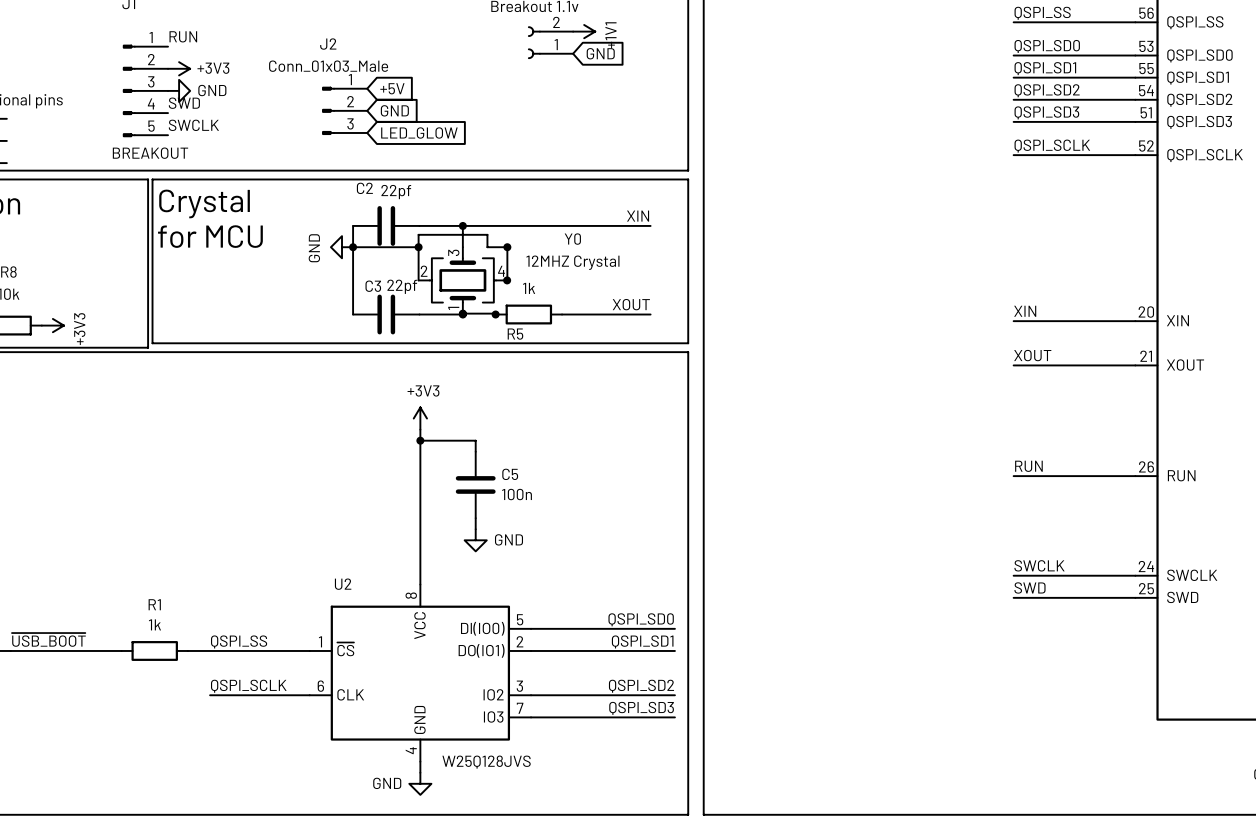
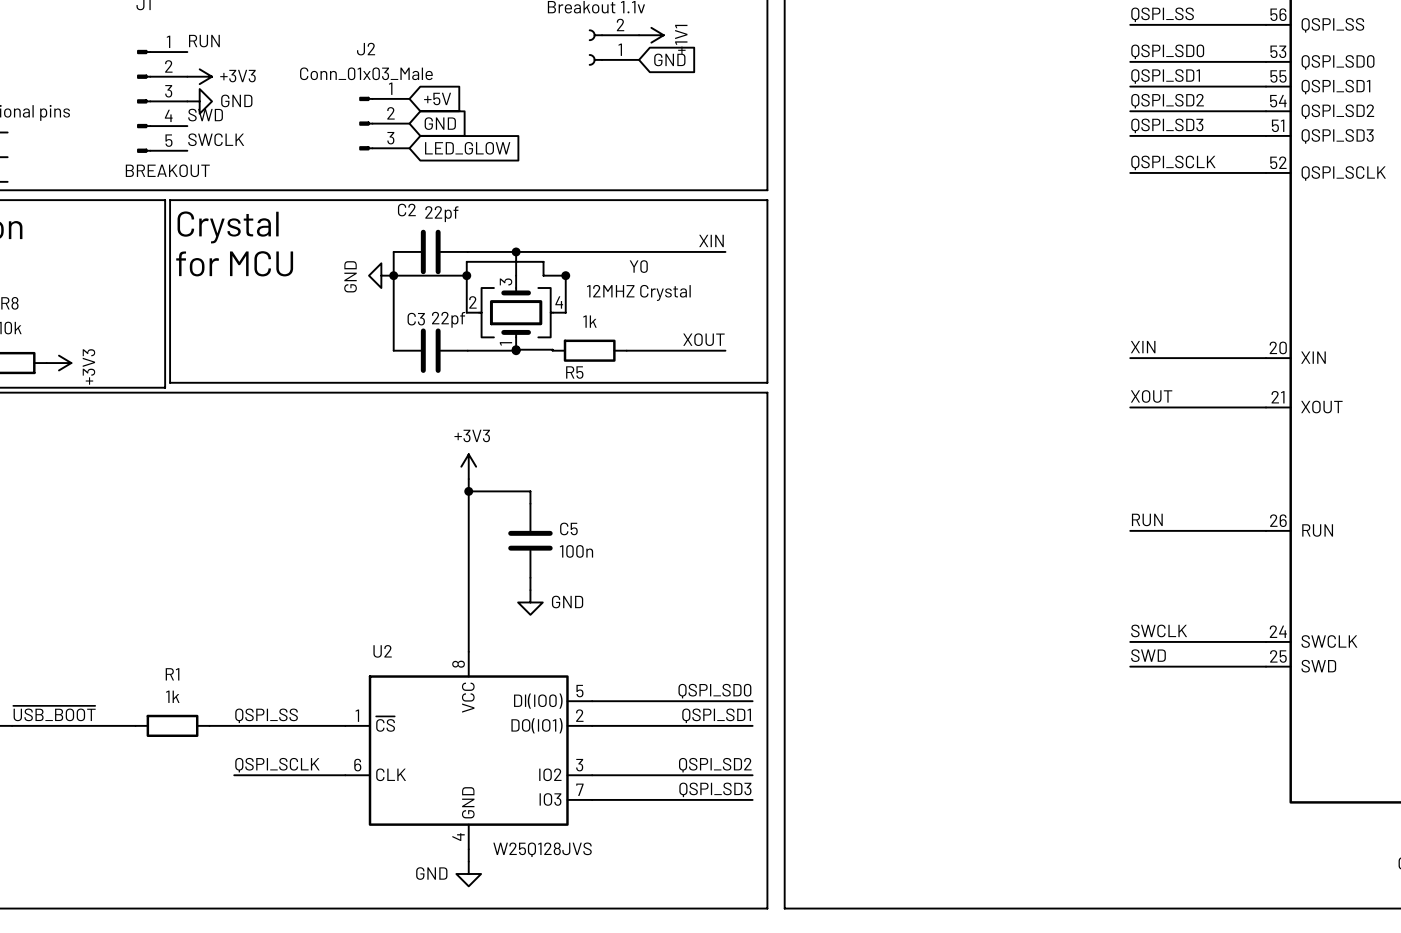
junction: (507, 280) -> none
junction: (495, 314) -> none

